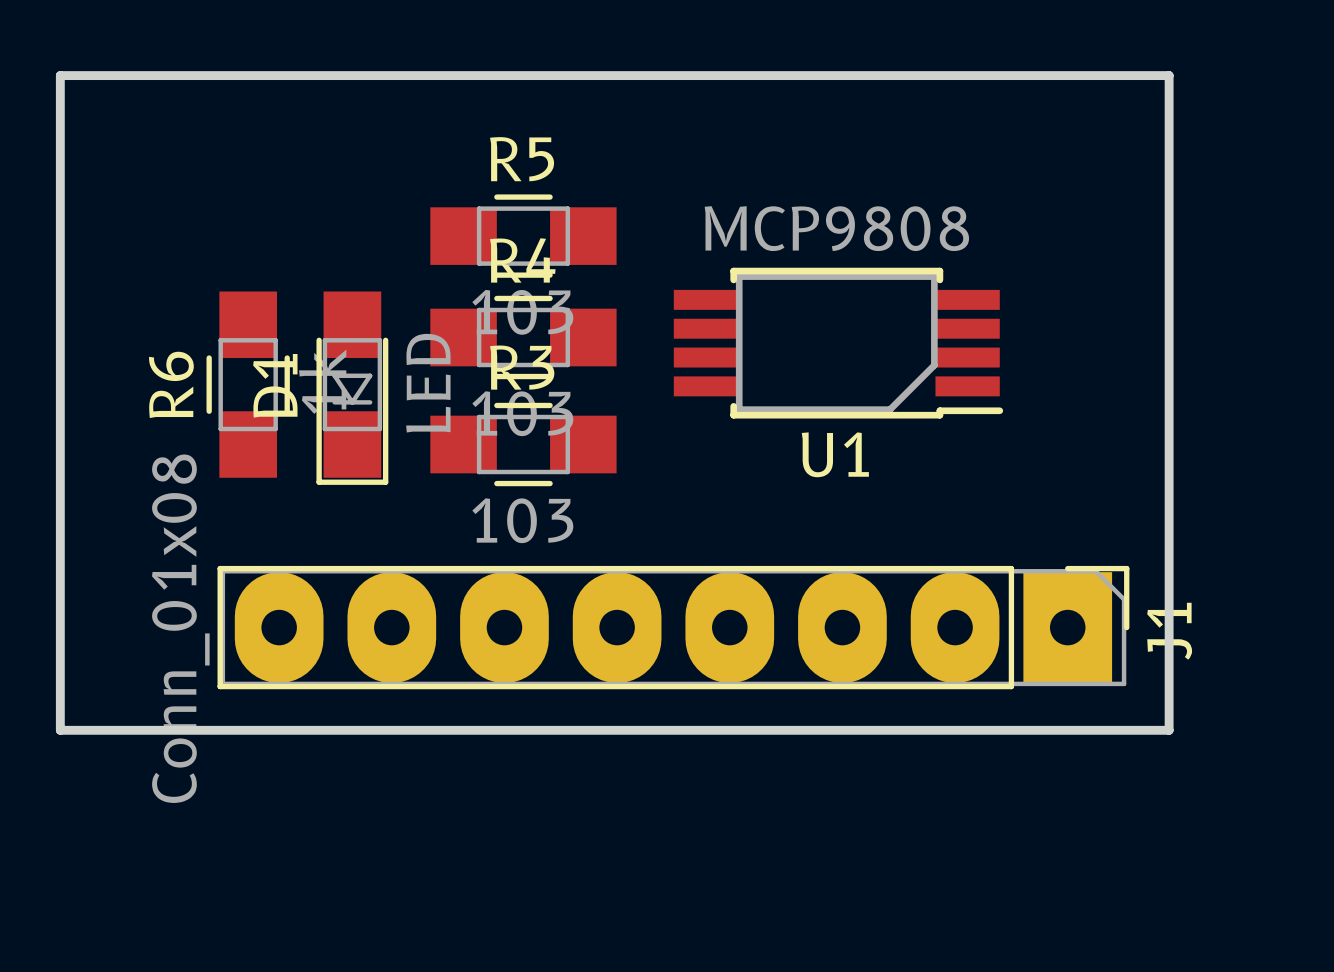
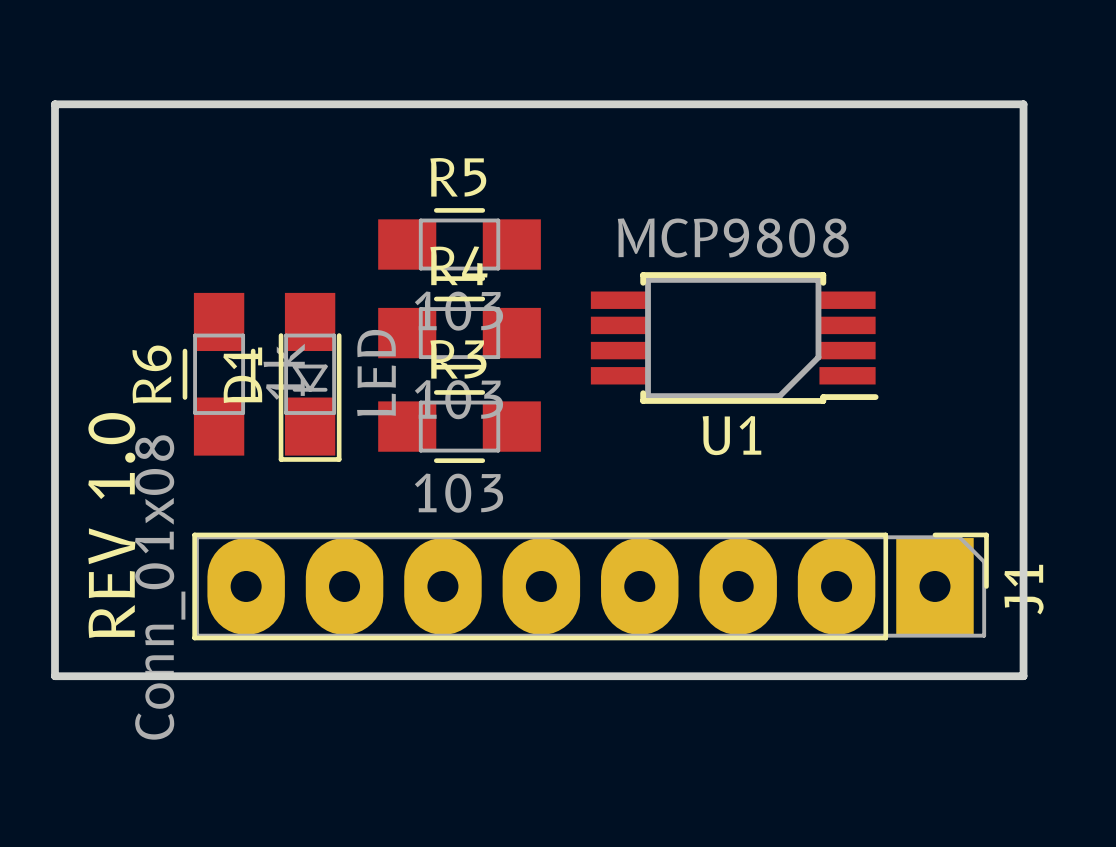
text: none -> REV 1.0 (111, 525)

